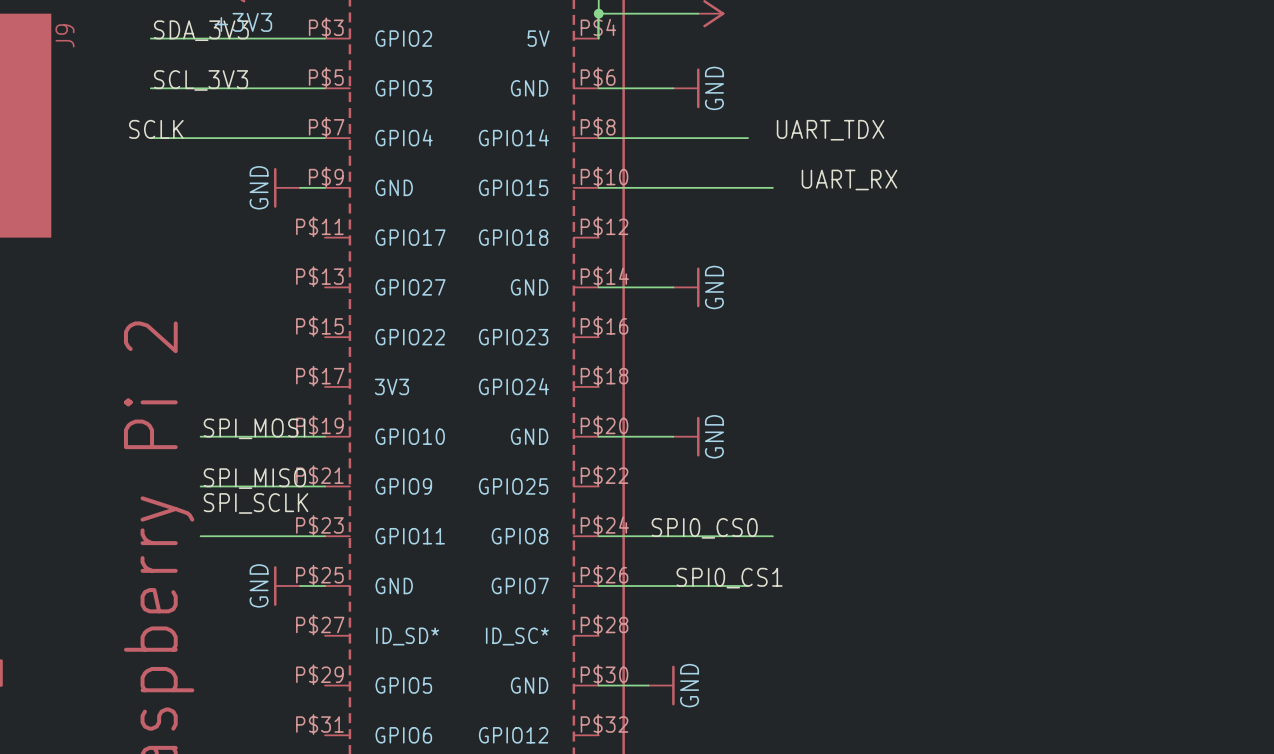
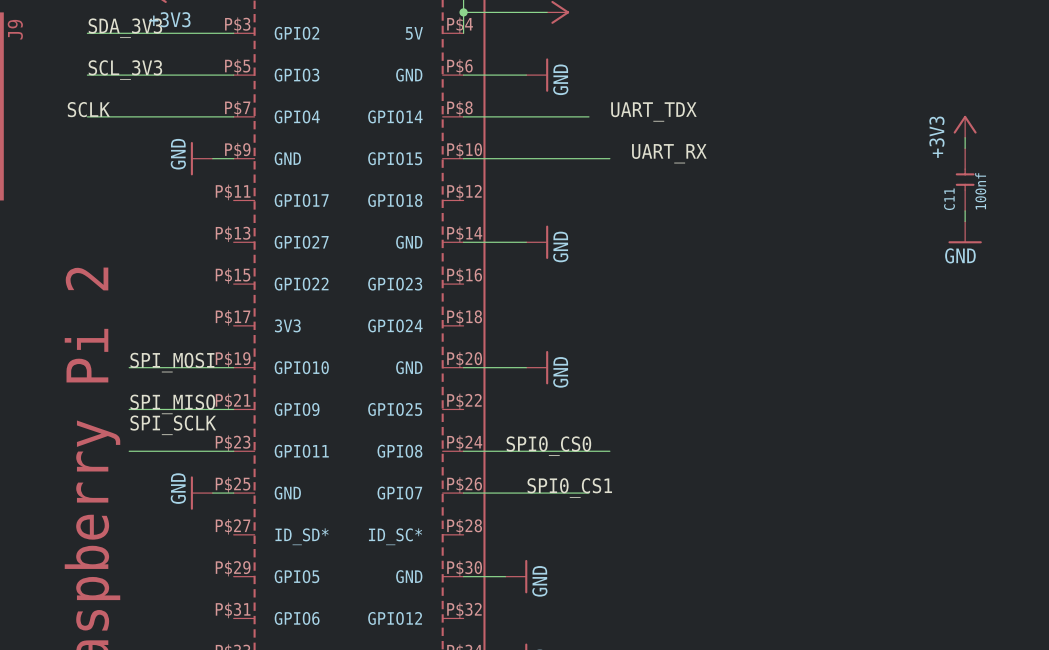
power symbol: none -> +3V3 (965, 126)
wire: none -> (965, 137) (965, 148)
C11: none -> 100nf (965, 179)
wire: none -> (965, 210) (965, 221)
power symbol: none -> GND (965, 232)

